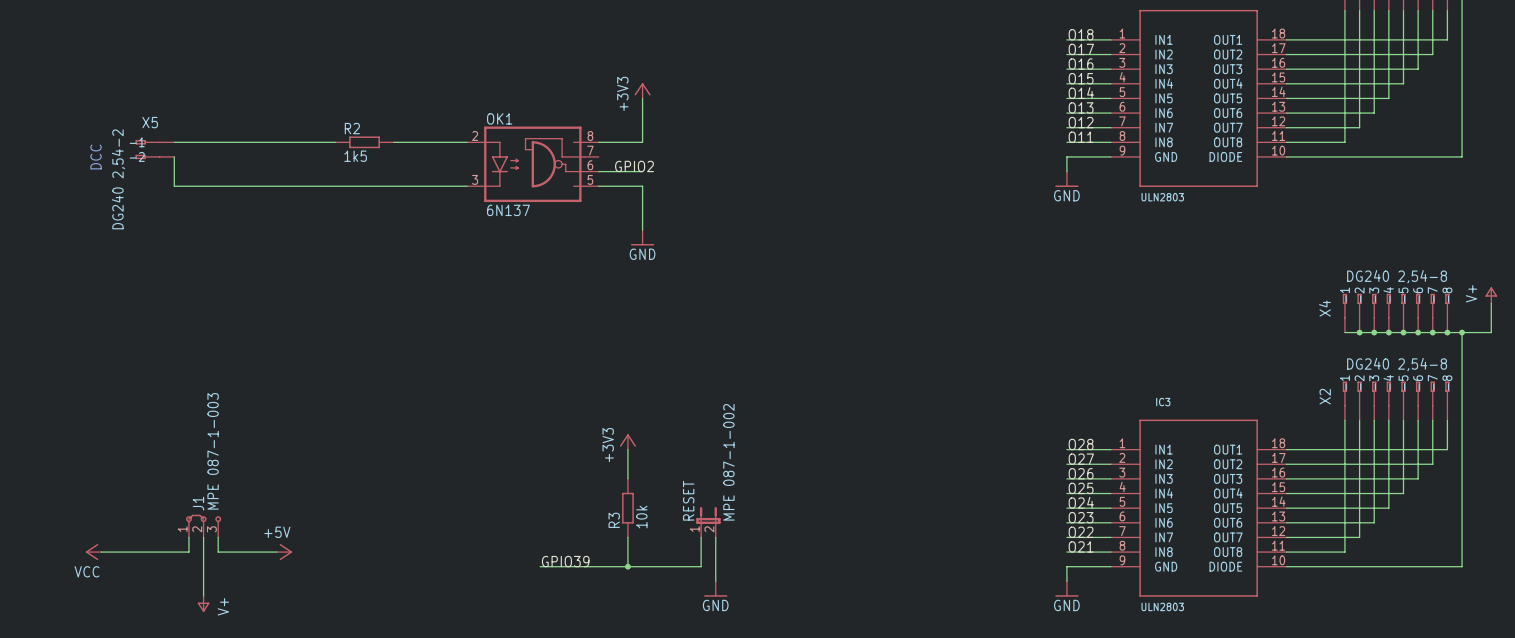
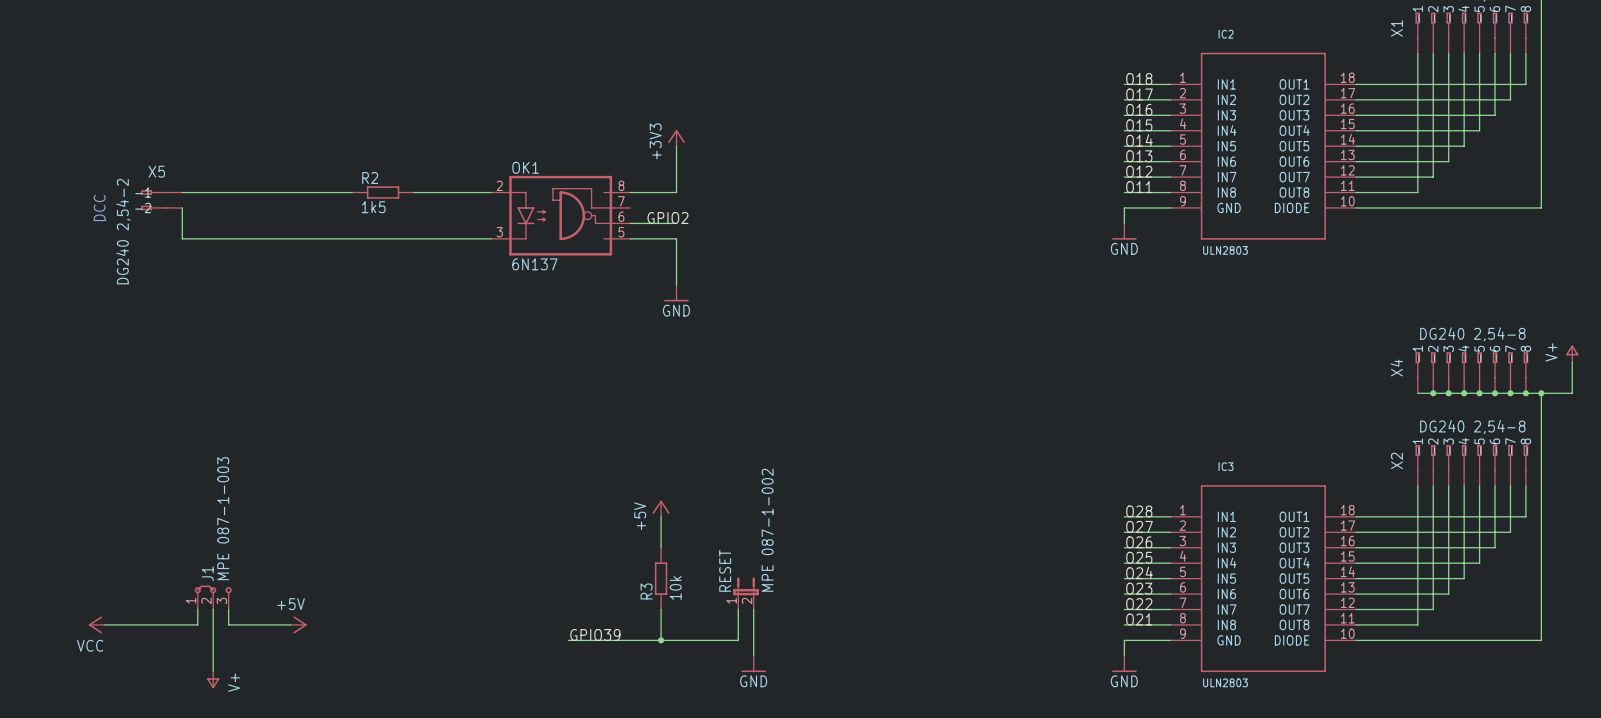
power symbol: +3V3 (627, 441) -> +5V (661, 508)

